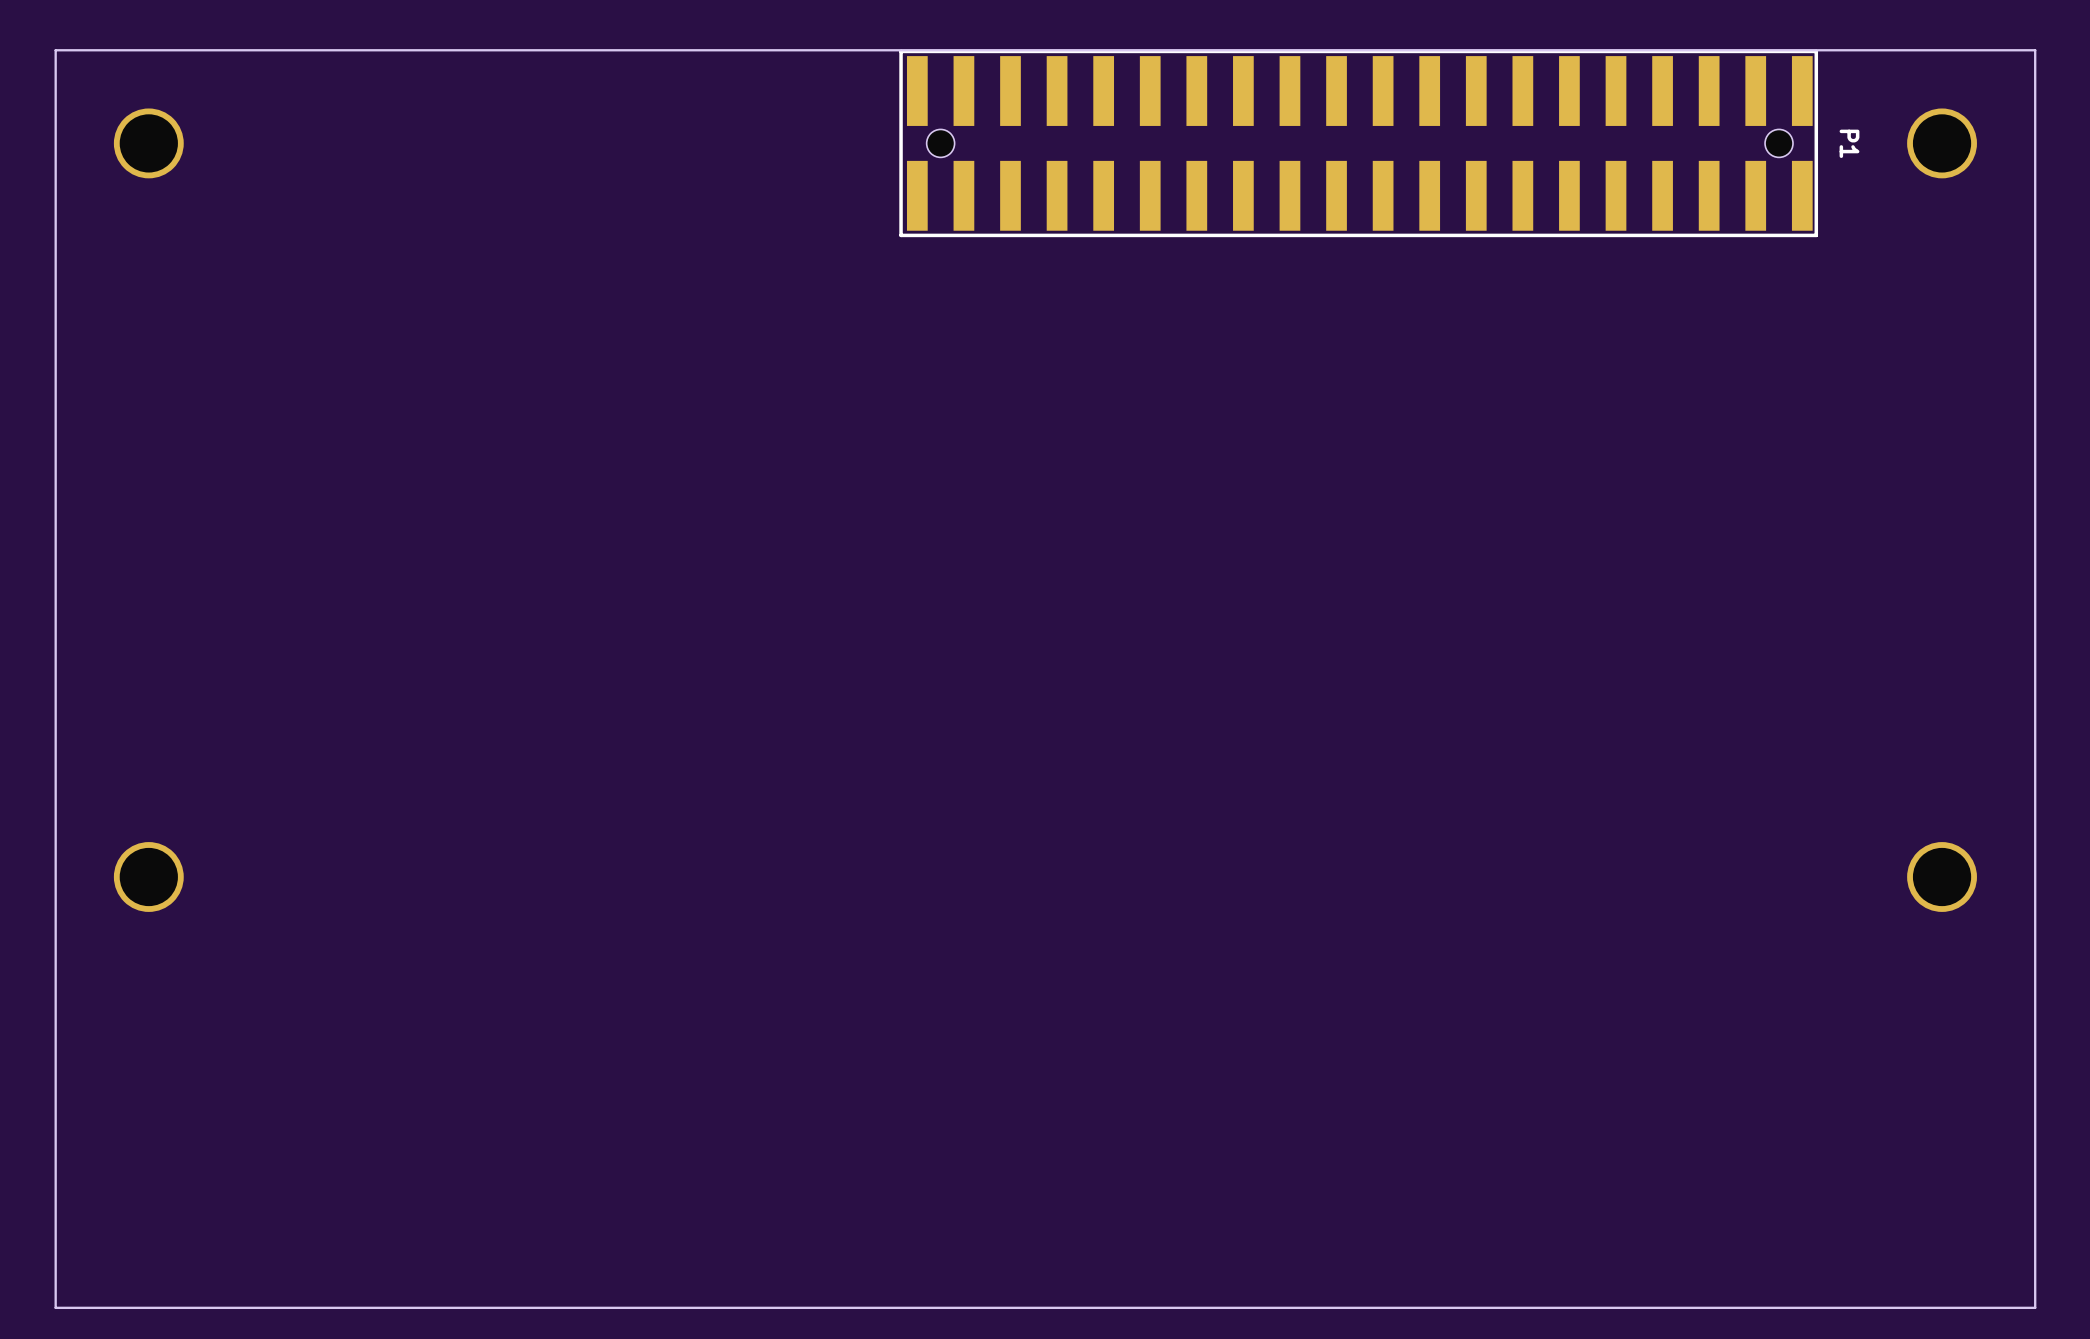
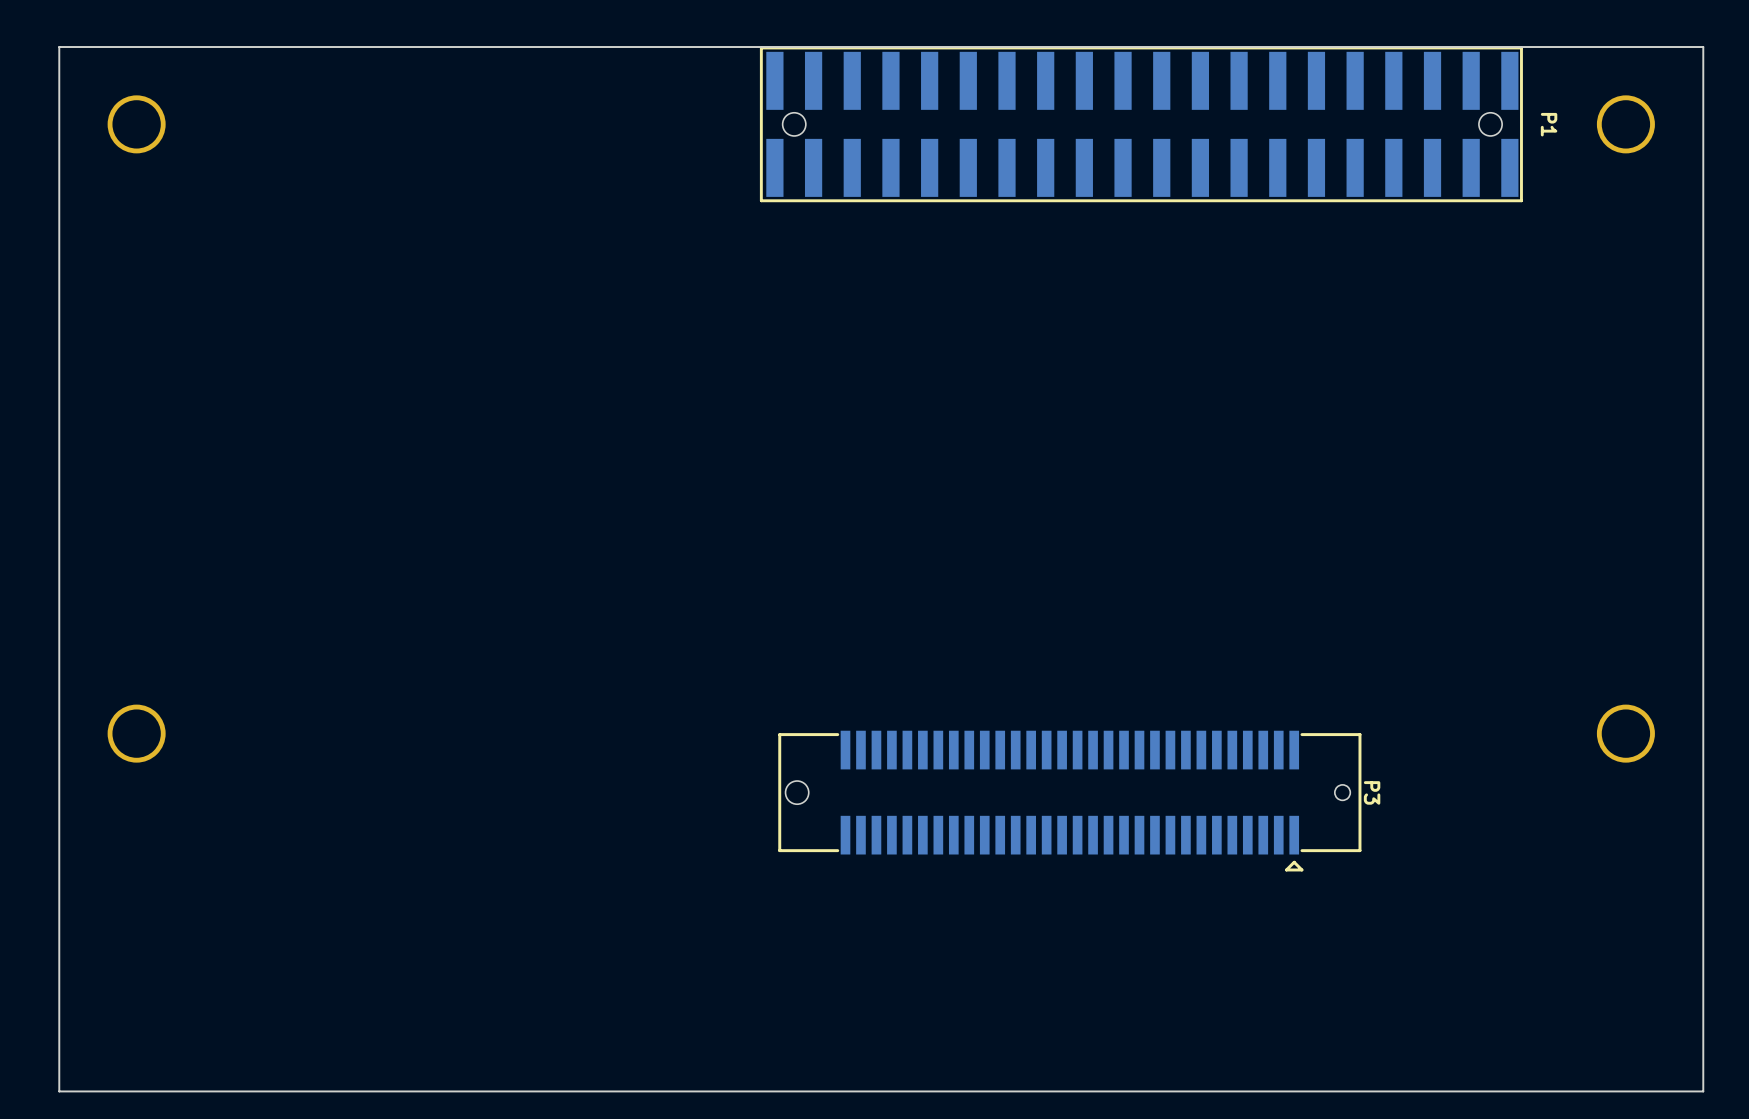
P3: none -> (1069, 801)

